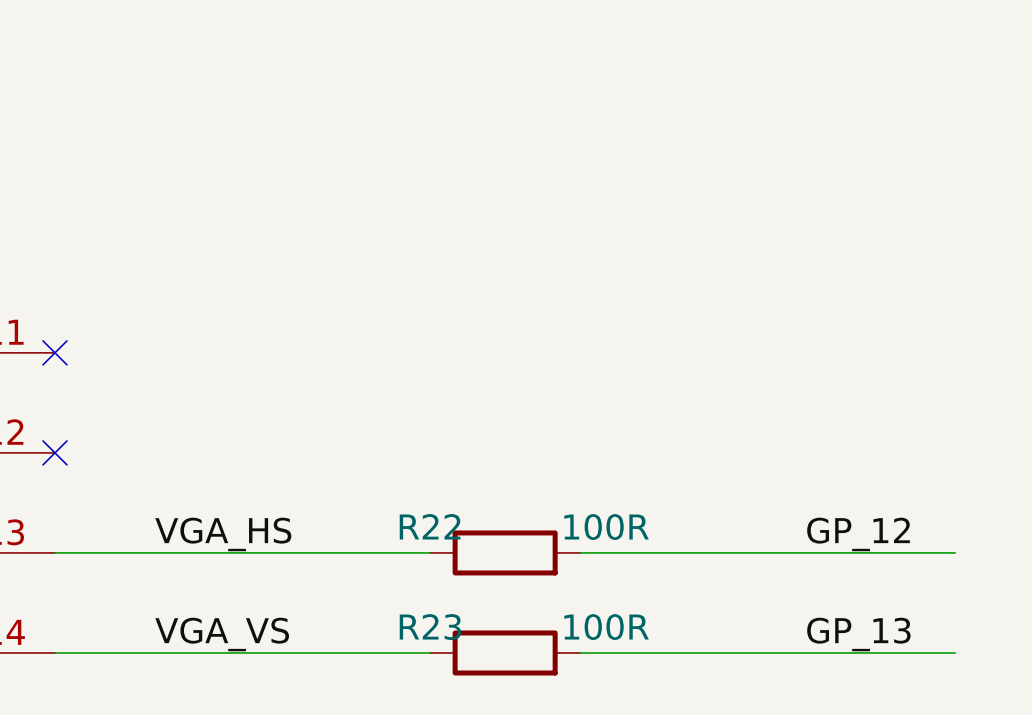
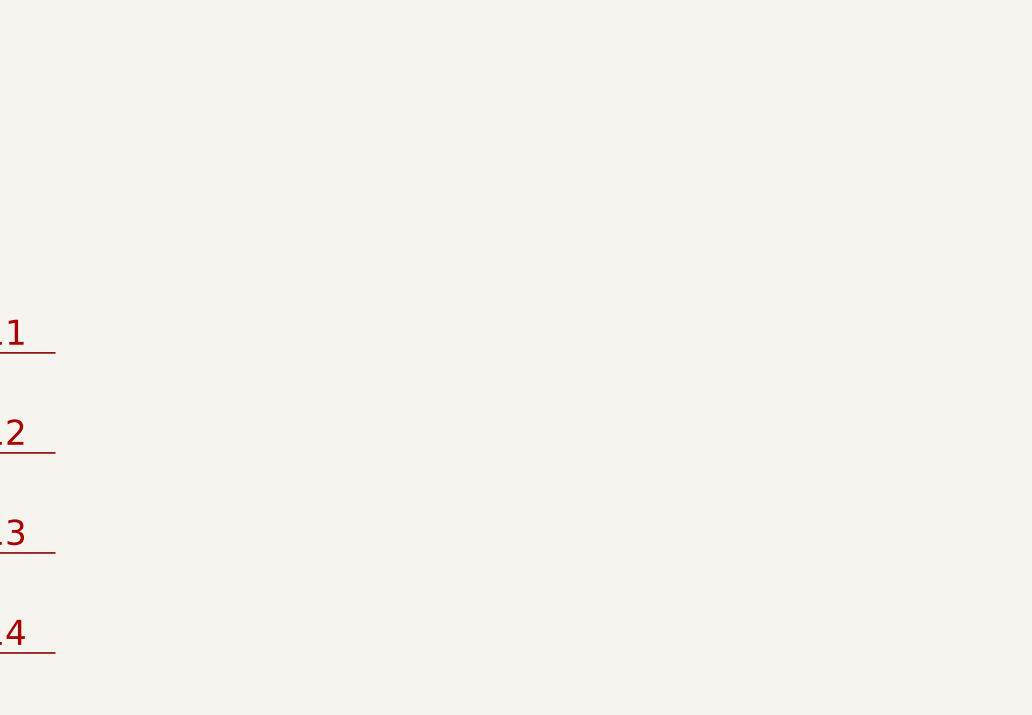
no-connect mark: (54, 352) -> none
no-connect mark: (54, 452) -> none
label: VGA_HS (223, 534) -> none
label: GP_12 (858, 534) -> none
wire: (54, 552) (430, 552) -> none
R22: 100R (505, 552) -> none
wire: (580, 552) (955, 552) -> none
label: VGA_VS (222, 634) -> none
label: GP_13 (858, 634) -> none
wire: (54, 652) (430, 652) -> none
R23: 100R (505, 652) -> none
wire: (580, 652) (955, 652) -> none

